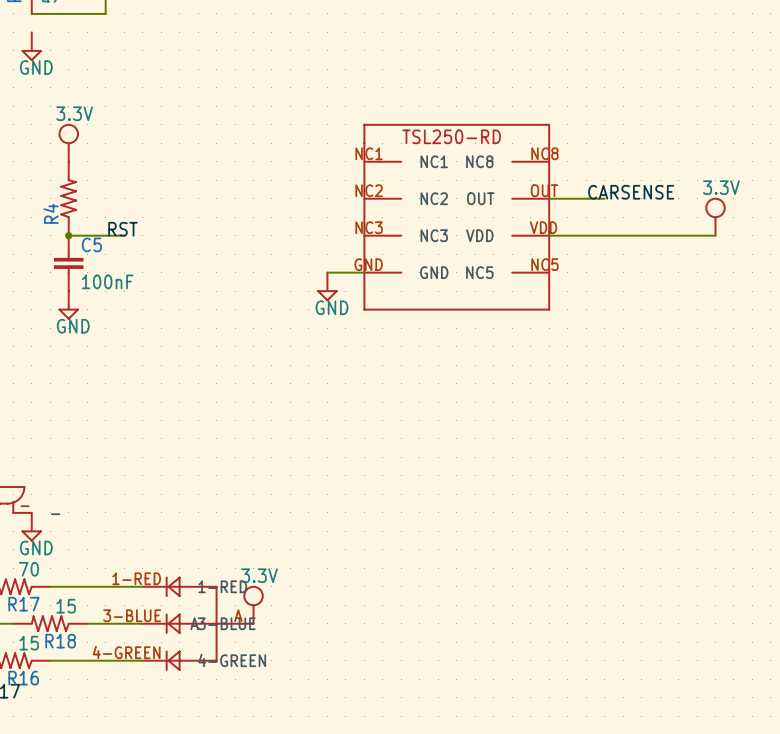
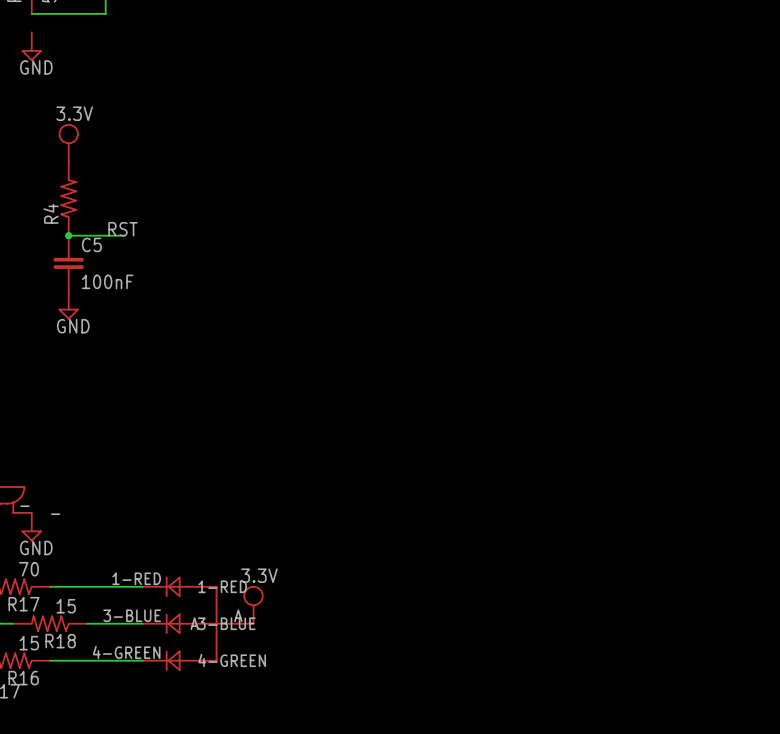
label: CARSENSE (631, 192) -> none
wire: (549, 198) (604, 198) -> none
power symbol: 3.3V (715, 216) -> none
part: (456, 217) -> none
wire: (549, 235) (715, 235) -> none
wire: (327, 272) (364, 272) -> none
power symbol: GND (327, 286) -> none

